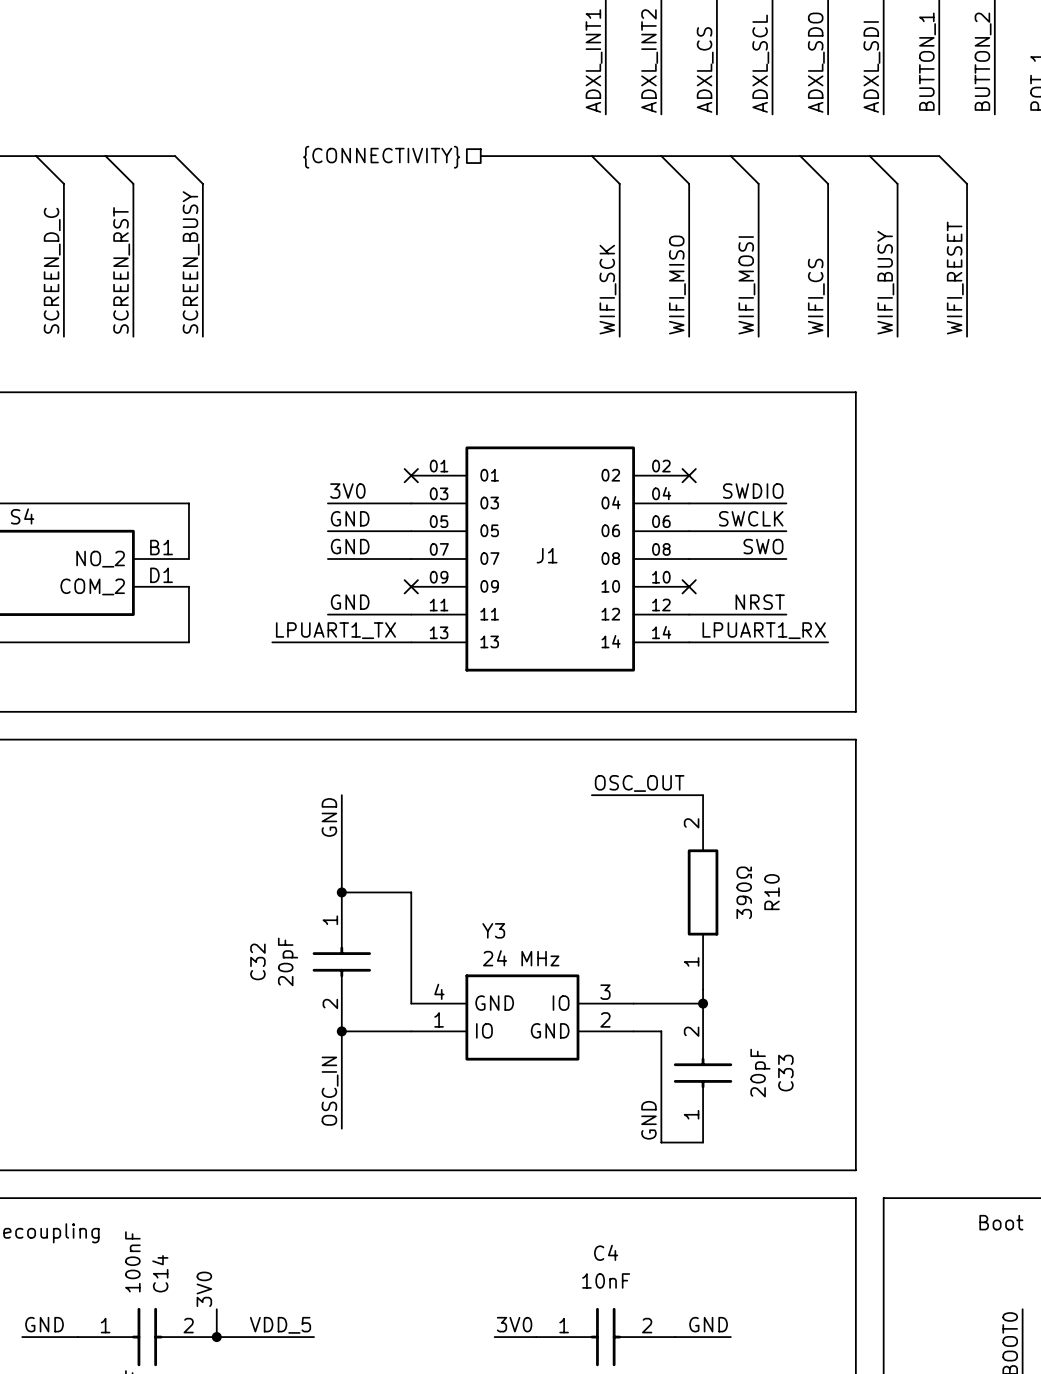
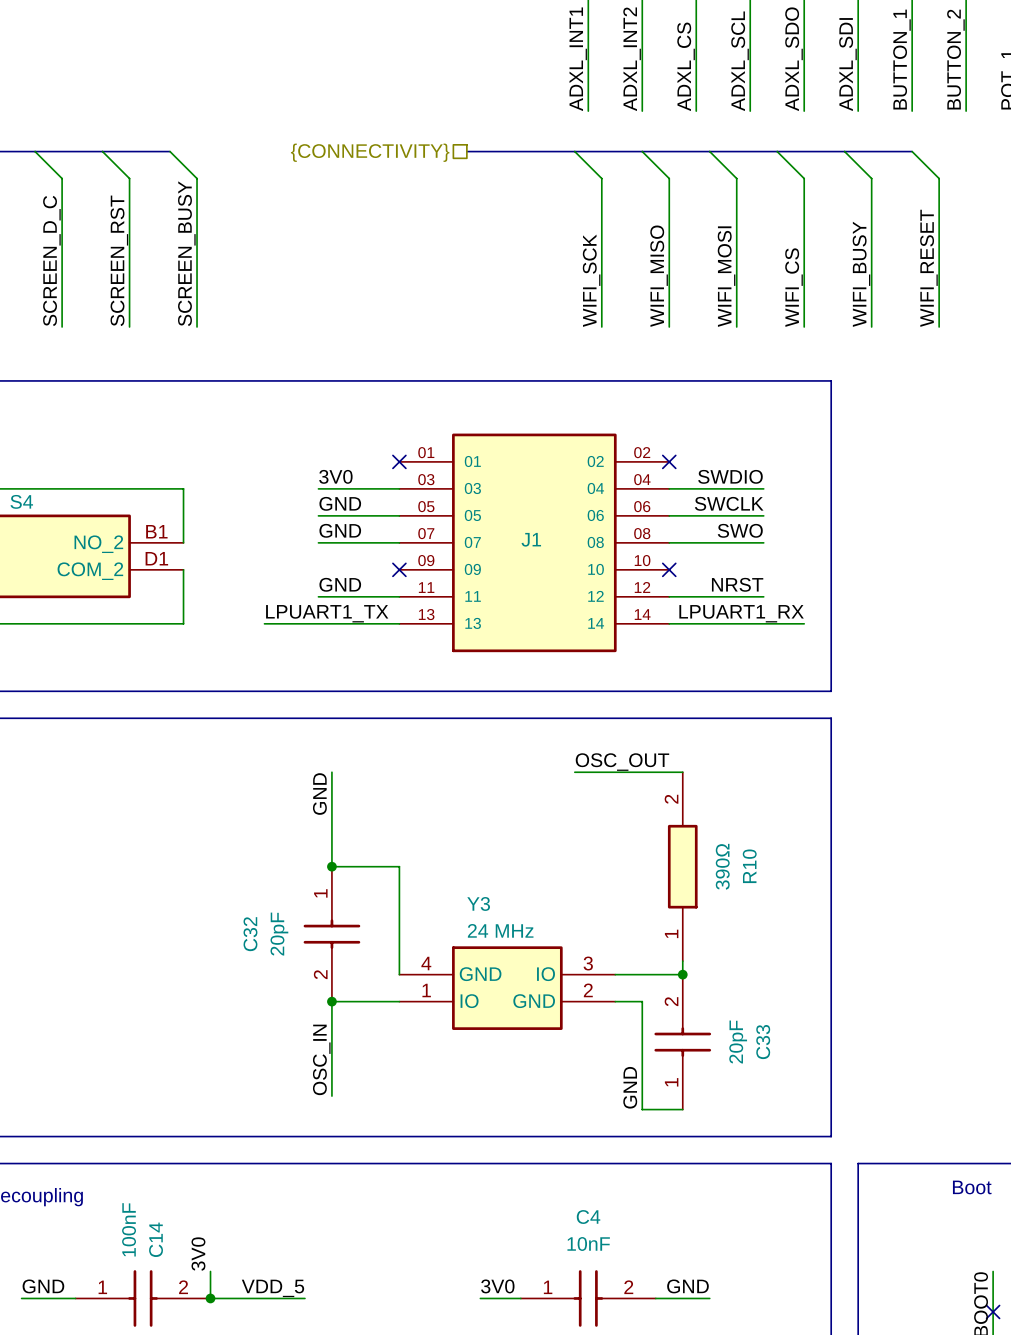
no-connect mark: none -> (993, 1311)

